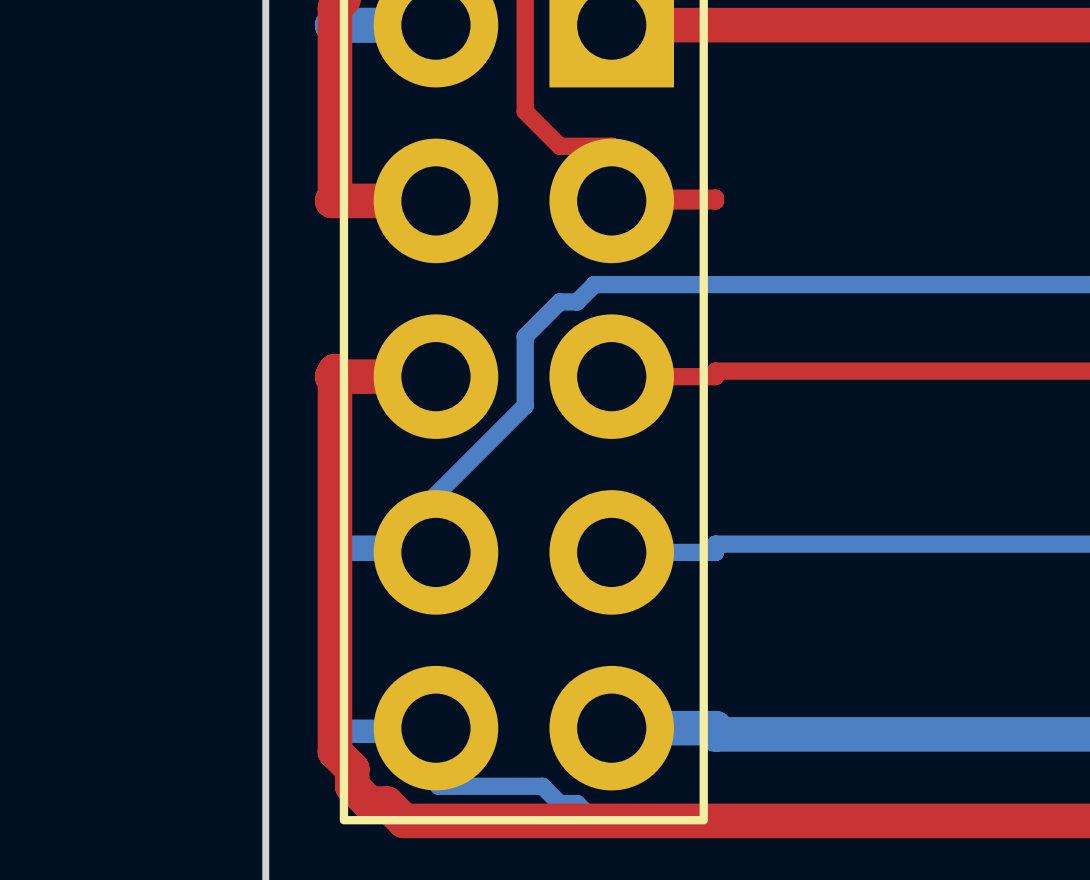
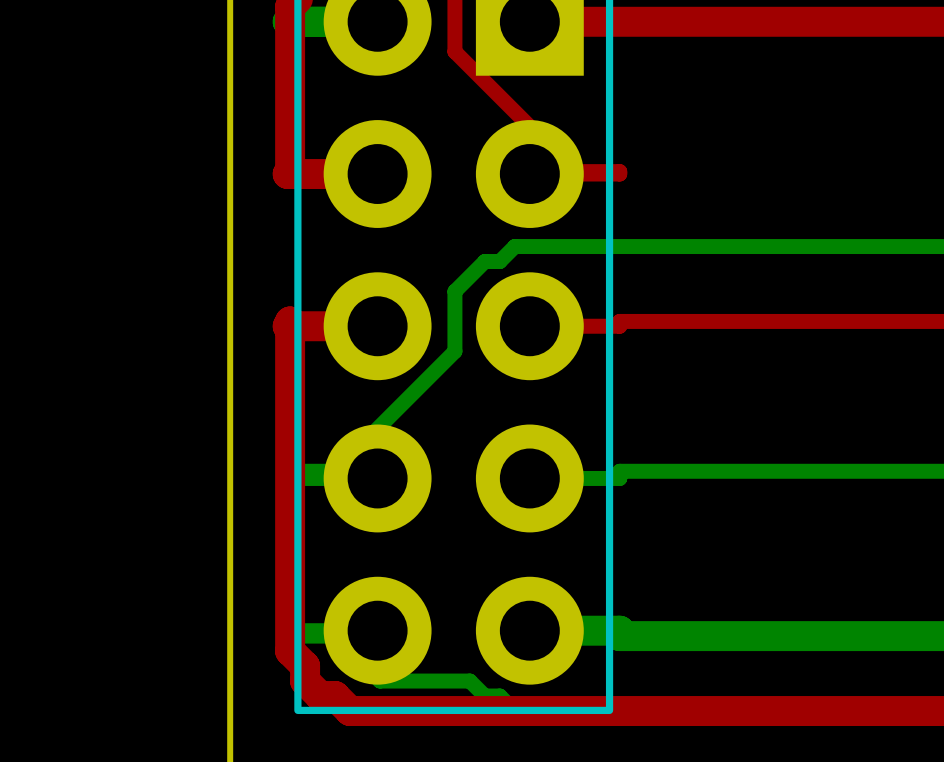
top track: (525, 59) (525, 111) (559, 146) (611, 146) -> (454, 51) (529, 126)

